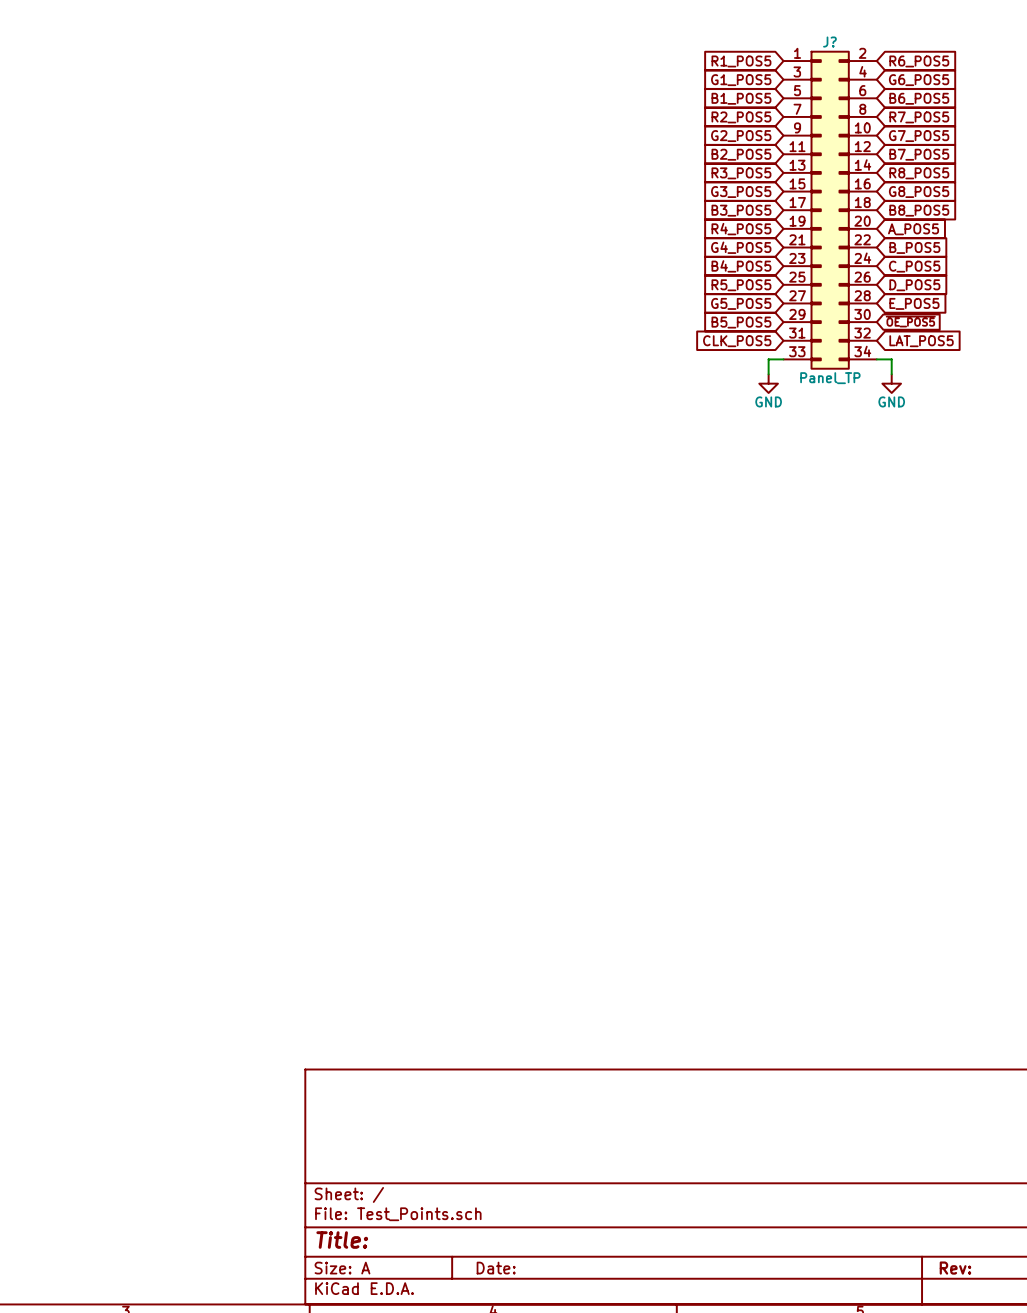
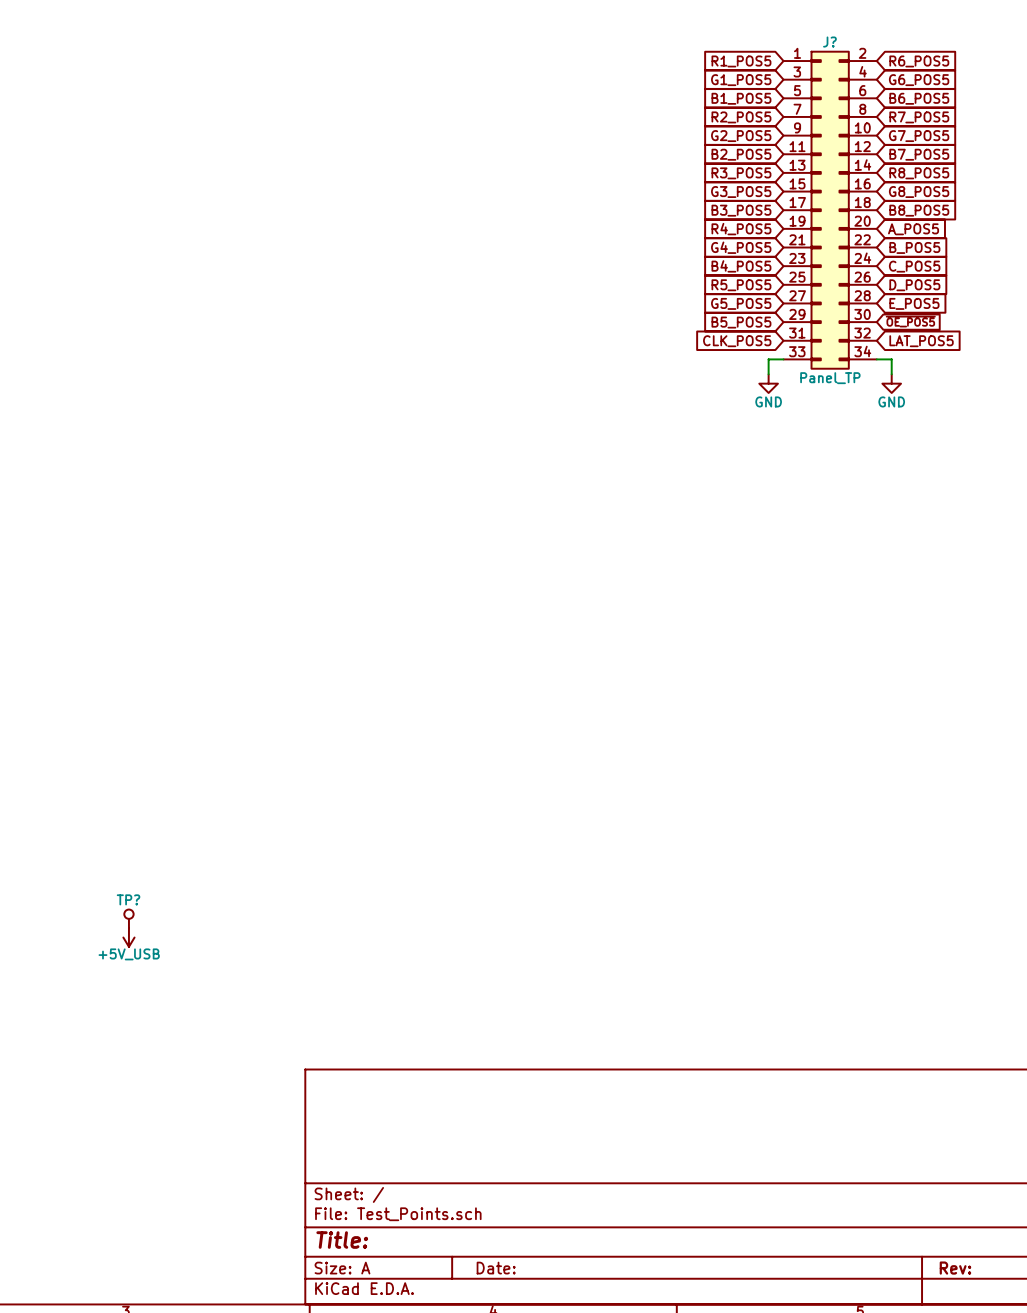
TP?: none -> (128, 918)
power symbol: none -> +5V_USB (128, 937)

